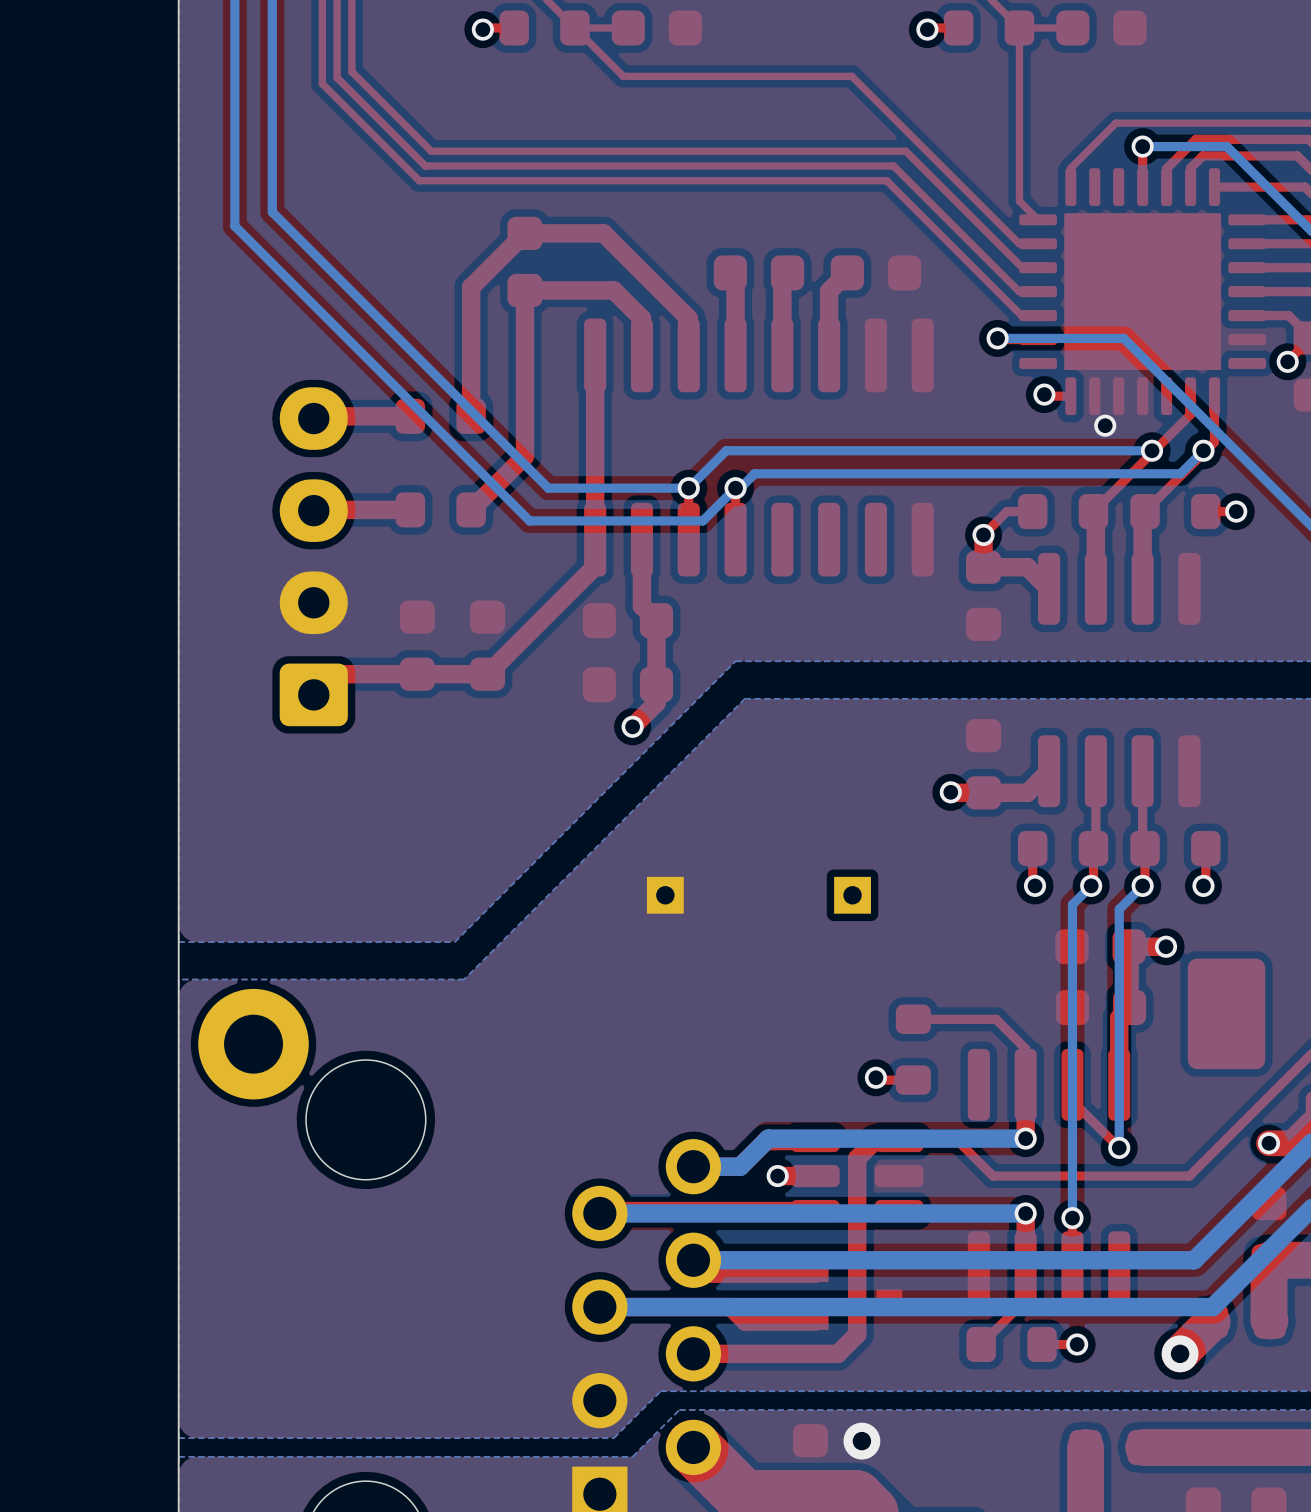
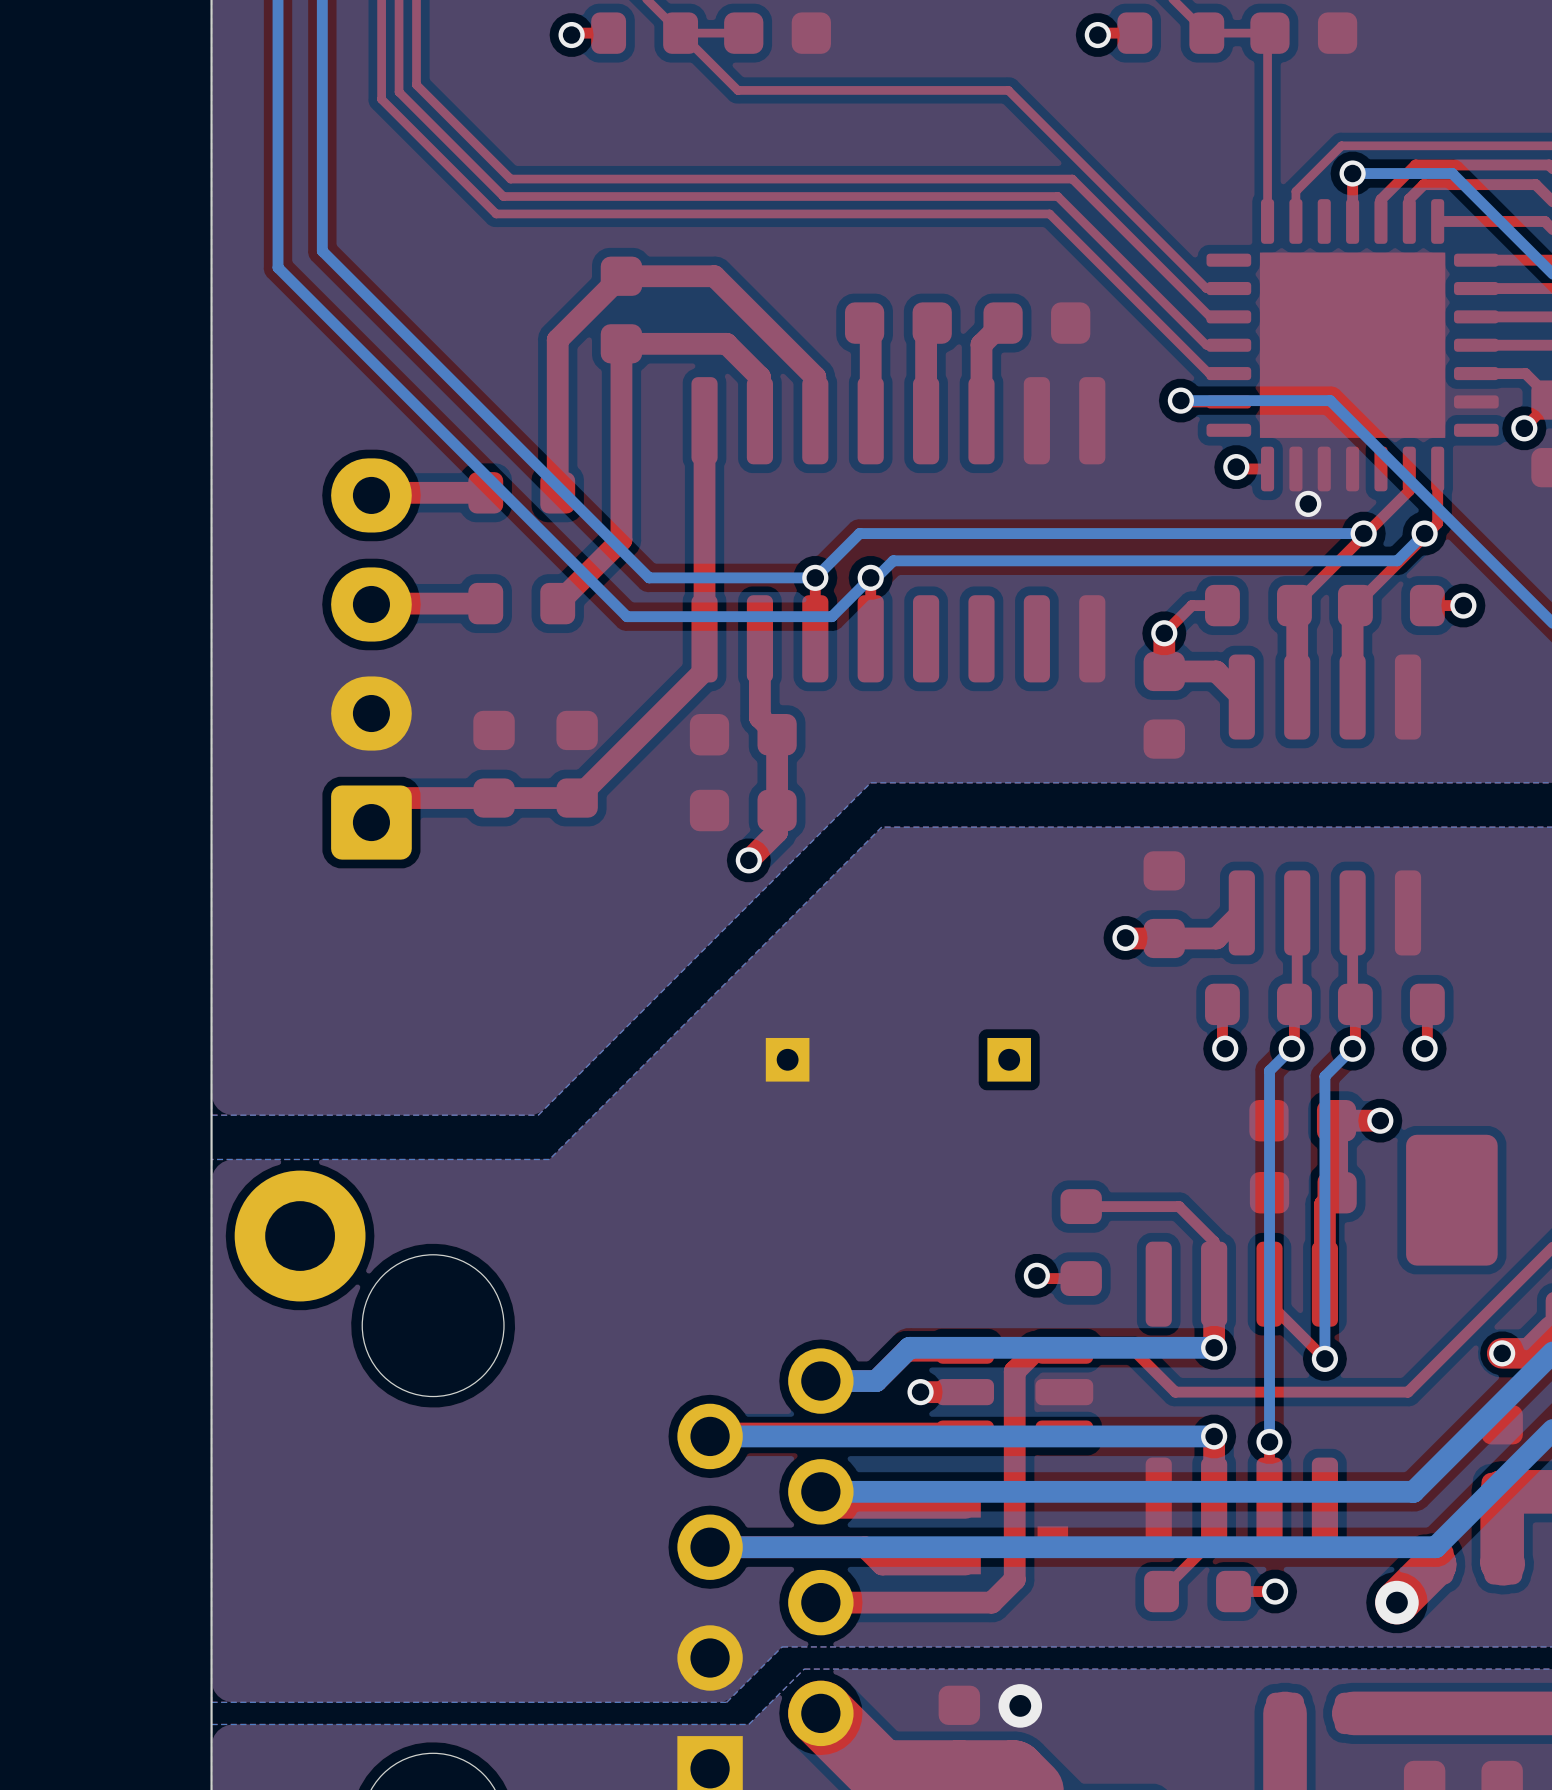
top track: (1019, 27) (1019, 201) (1038, 219) -> none
top track: none -> (1269, 33) (1267, 35) (1267, 199)
top track: (1133, 123) (1115, 123) (1070, 168) -> (1341, 145) (1295, 191) (1295, 221)

